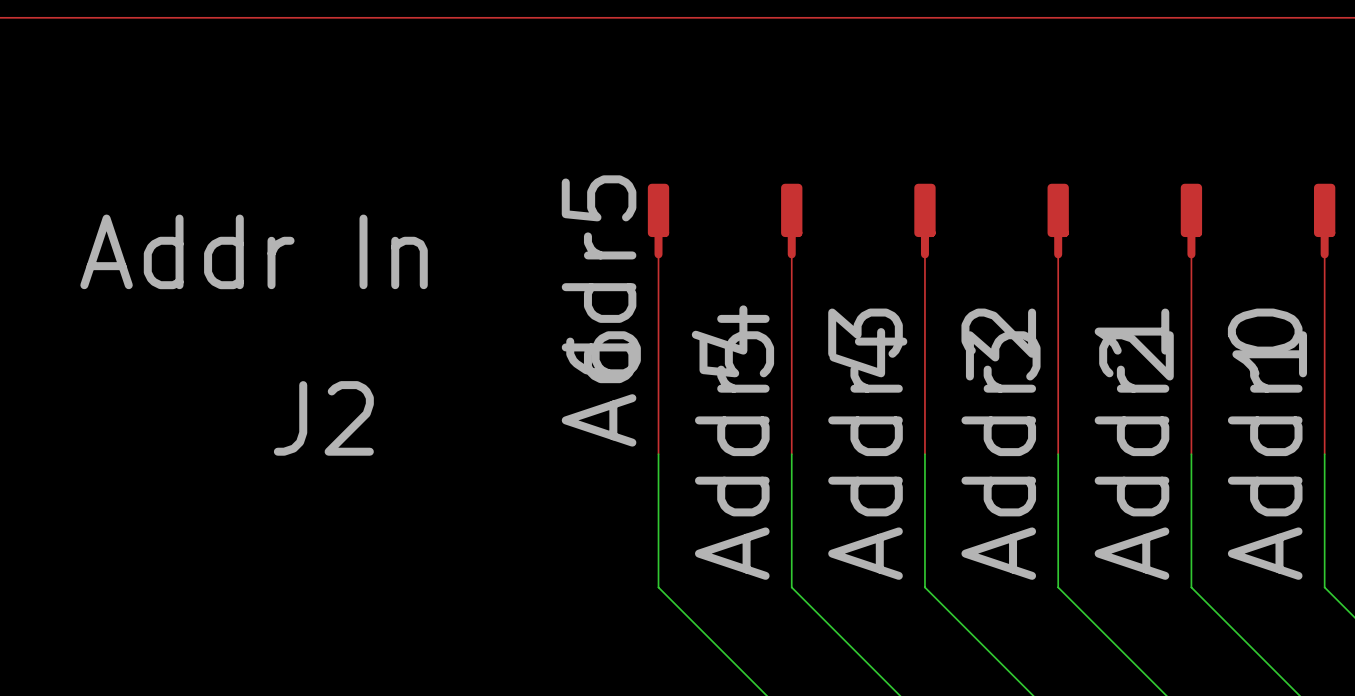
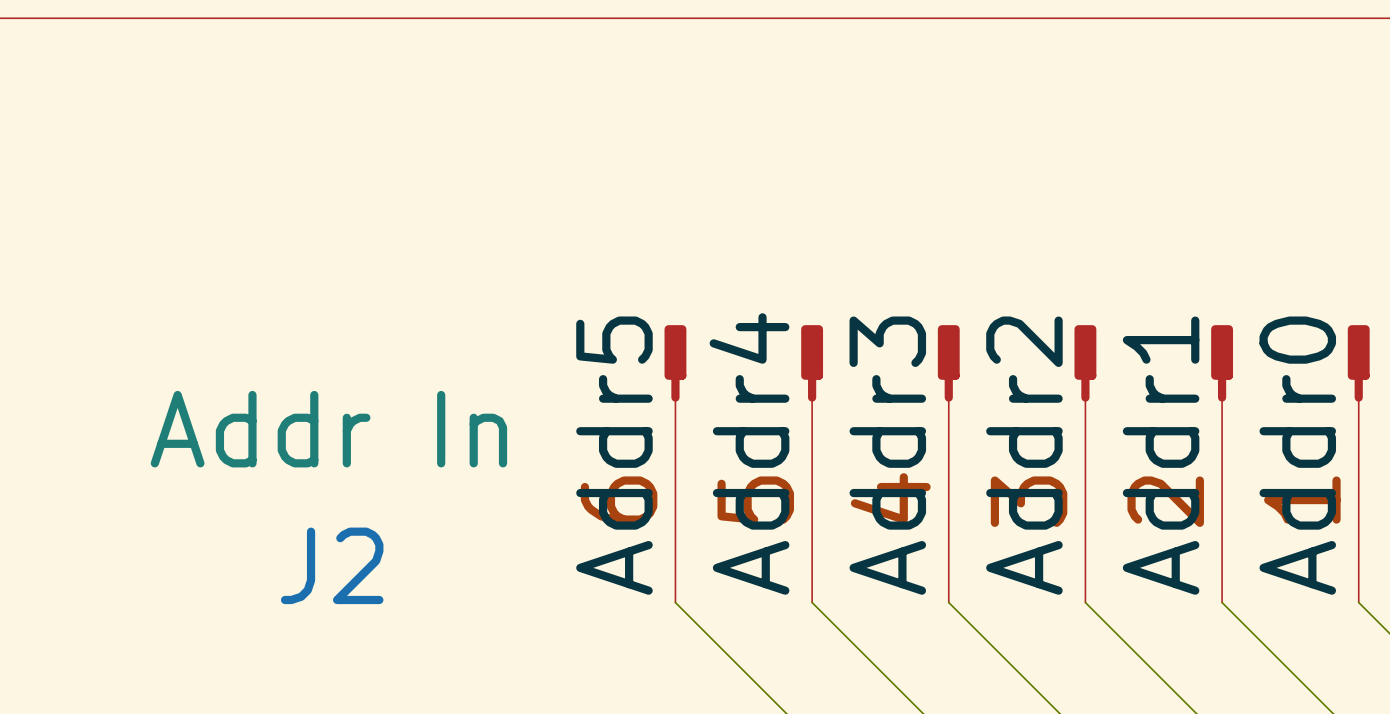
J2 value position: Addr In (254, 251) -> Addr In (328, 429)
label position: Addr5 (599, 310) -> Addr5 (614, 455)
J2 position: (991, 318) -> (1017, 463)

